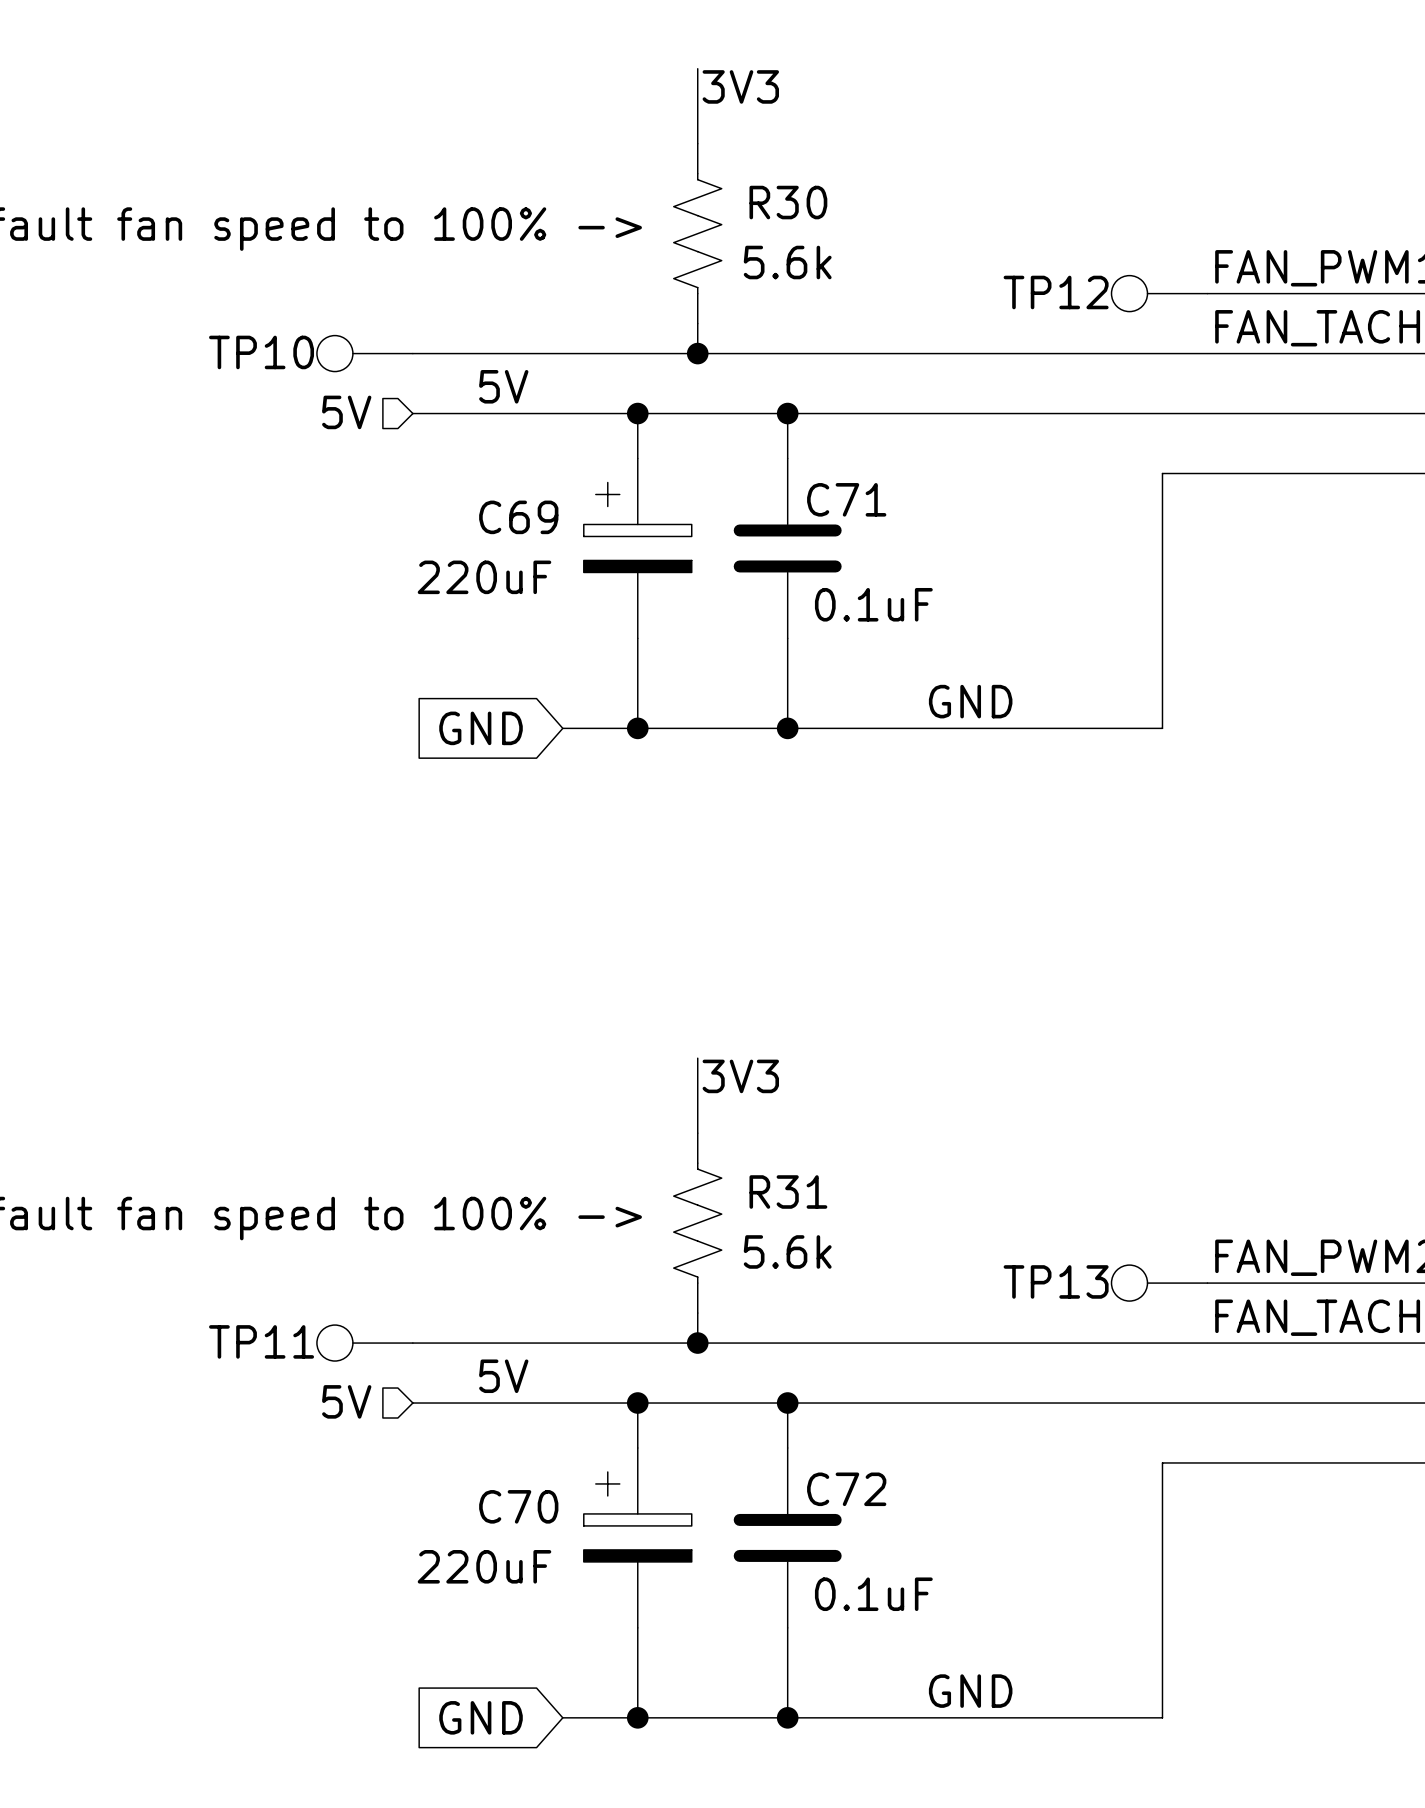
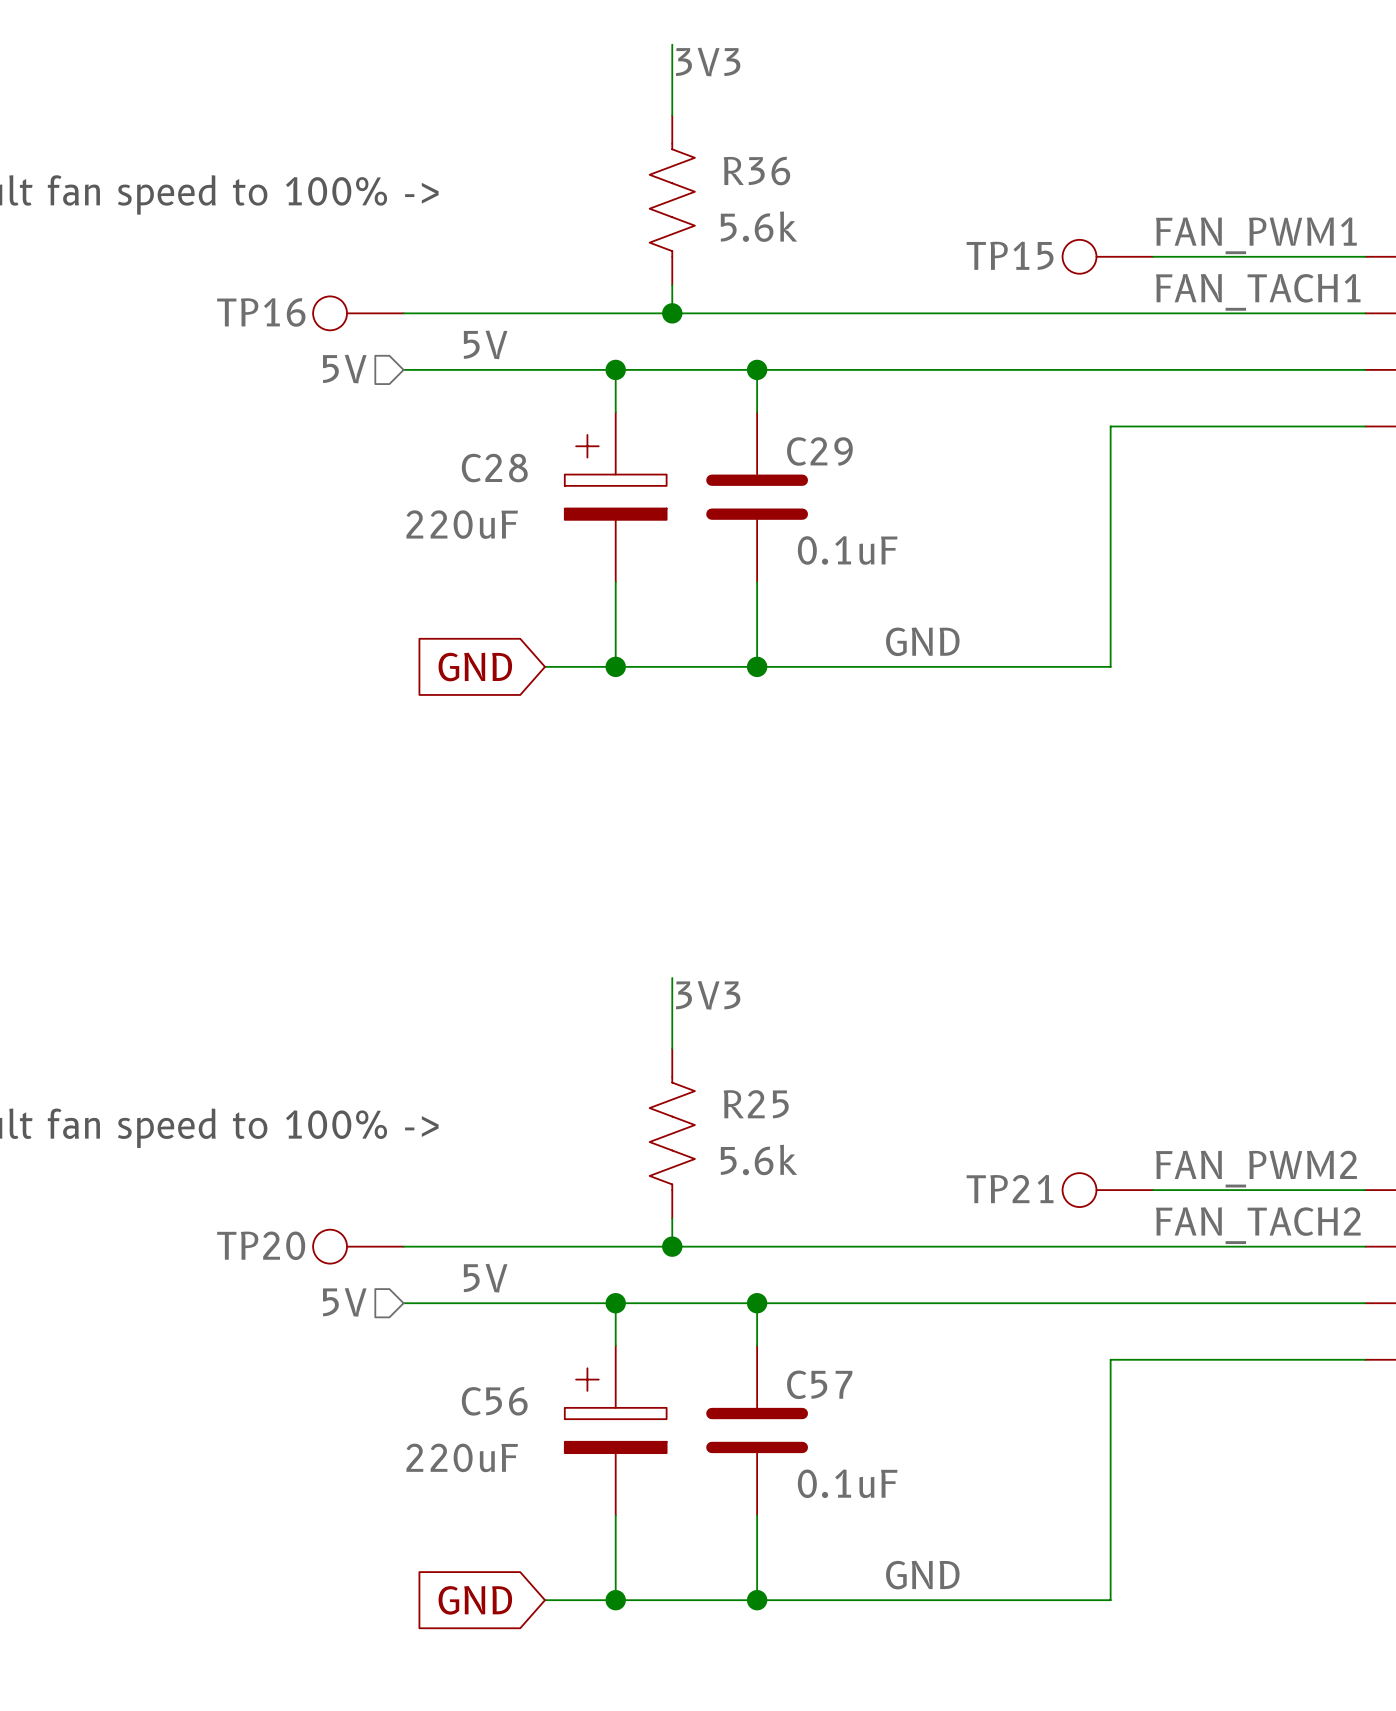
R30 name: R30 (788, 202) -> R36 (756, 171)
TP12 name: TP12 (1056, 292) -> TP15 (1010, 255)
TP10 name: TP10 (261, 352) -> TP16 (261, 312)
C71 name: C71 (846, 499) -> C29 (819, 451)
C69 name: C69 (518, 517) -> C28 (494, 468)
R31 name: R31 (788, 1192) -> R25 (756, 1104)
TP13 name: TP13 (1056, 1281) -> TP21 (1010, 1189)
TP11 name: TP11 (261, 1341) -> TP20 (261, 1245)
C72 name: C72 (846, 1489) -> C57 (819, 1384)
C70 name: C70 (518, 1506) -> C56 (494, 1401)

